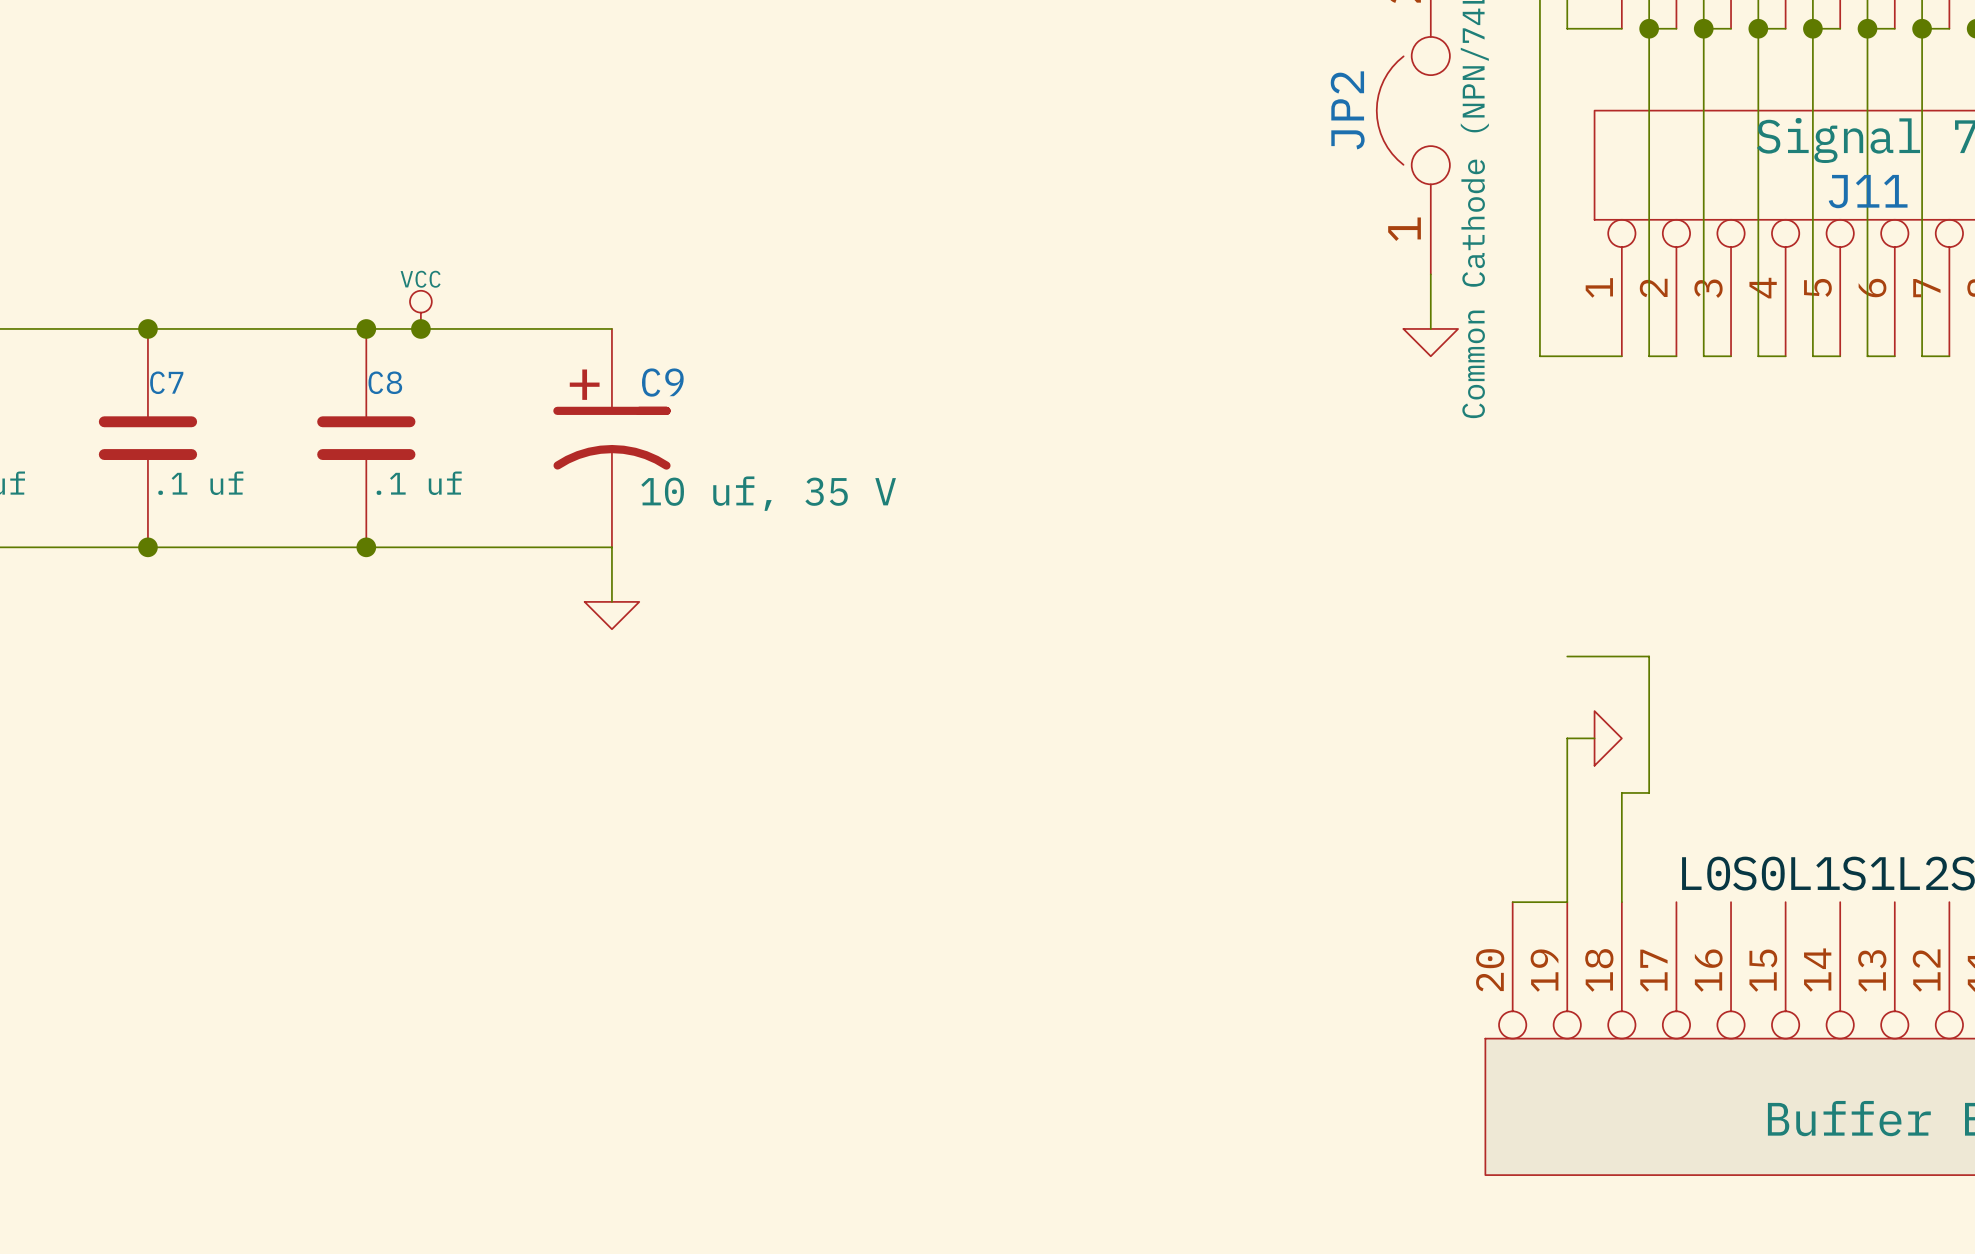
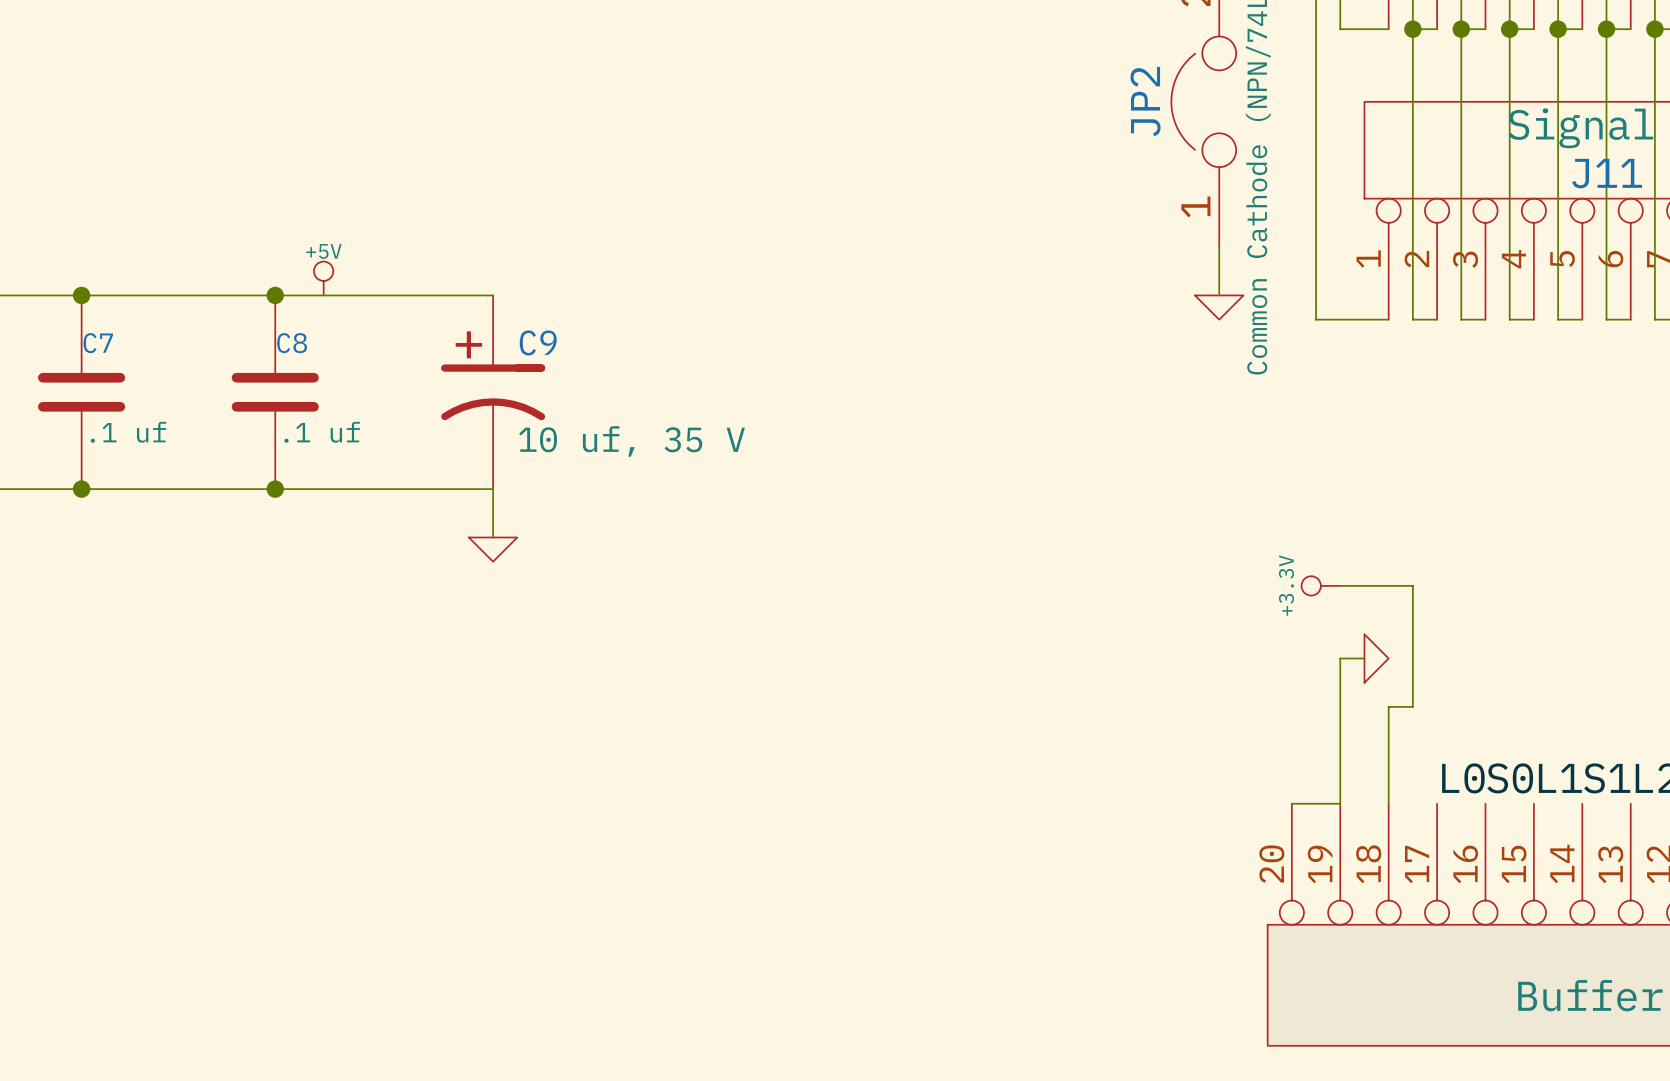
power symbol: VCC (420, 309) -> +5V (323, 278)
junction: (420, 328) -> none
power symbol: none -> +3.3V (1320, 585)

